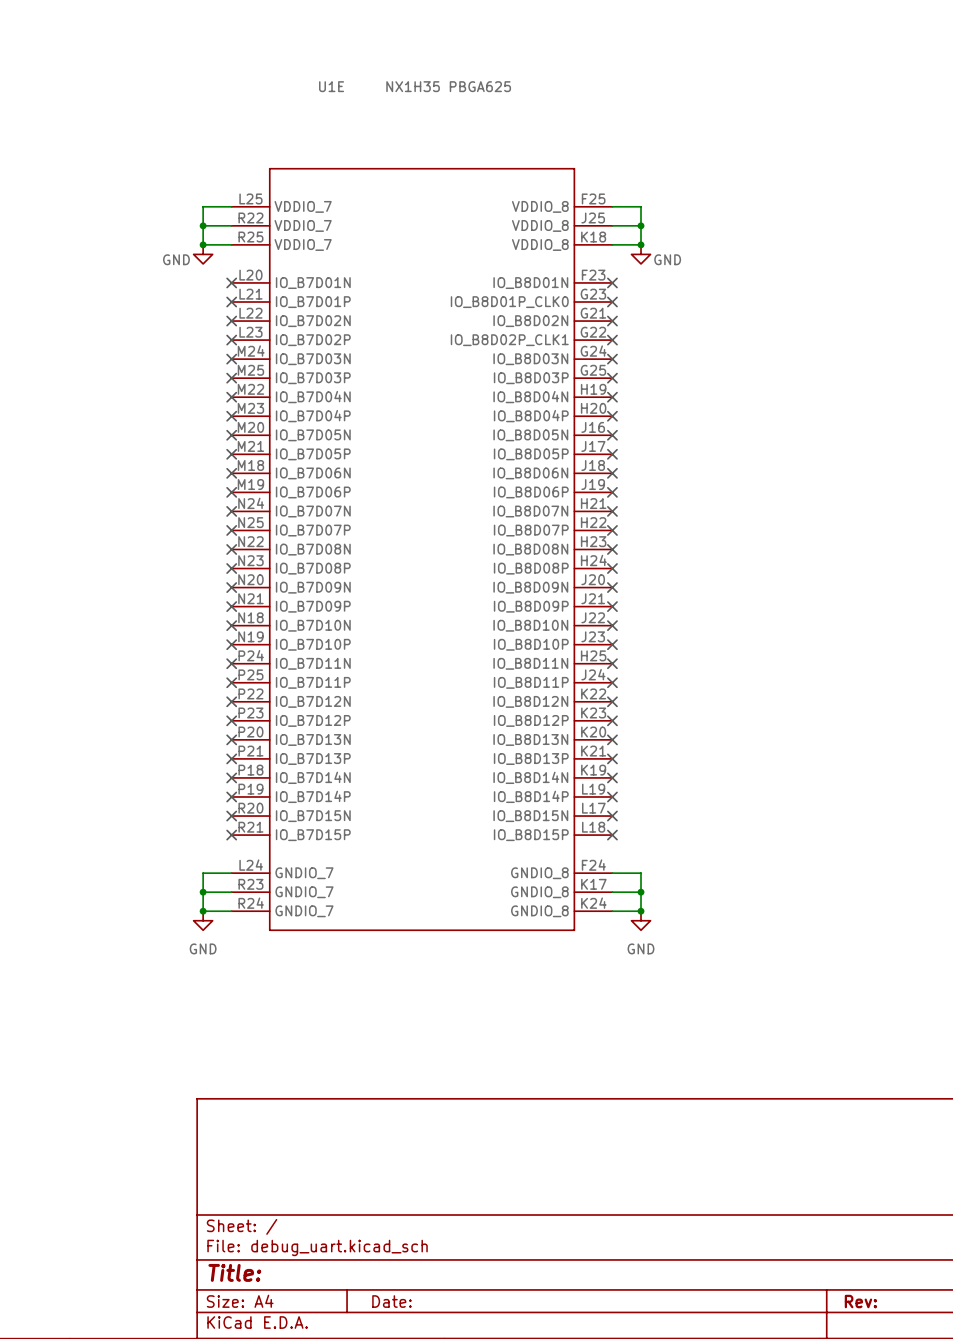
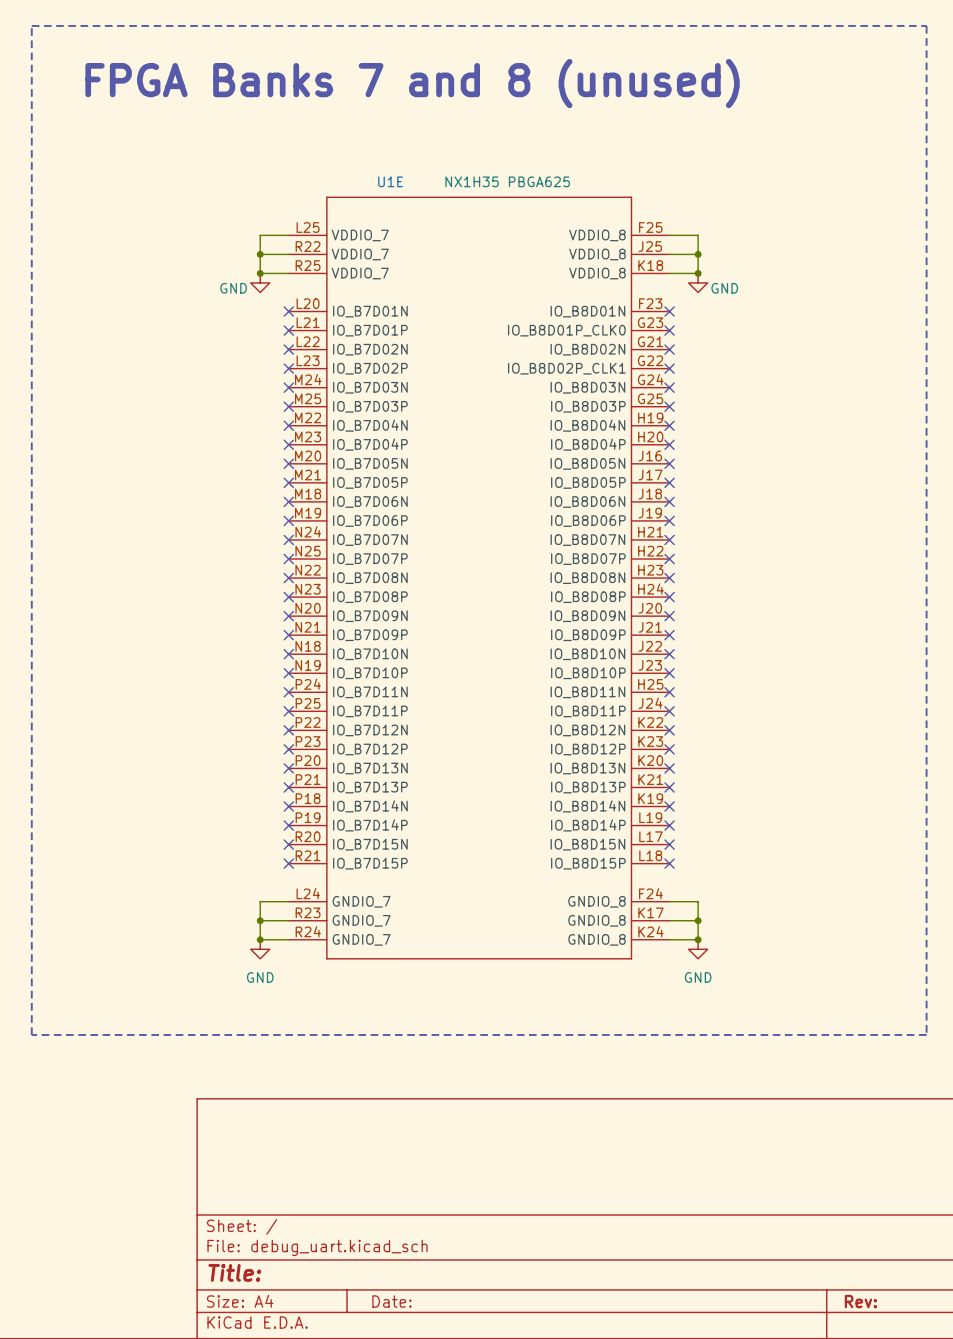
line: none -> (31, 25) (926, 25) (926, 1034) (31, 1034) (31, 25)
text: none -> FPGA Banks 7 and 8 (unused) (412, 83)
U1E name position: U1E (331, 86) -> U1E (390, 181)
U1E value position: NX1H35 PBGA625 (448, 86) -> NX1H35 PBGA625 (507, 181)
wire: (231, 206) (203, 206) (203, 244) (231, 244) -> (288, 235) (260, 235) (260, 273) (288, 273)
wire: (612, 206) (641, 206) (641, 244) (612, 244) -> (669, 235) (698, 235) (698, 273) (669, 273)
wire: (203, 225) (231, 225) -> (260, 254) (288, 254)
junction: (203, 225) -> none
wire: (612, 225) (641, 225) -> (669, 254) (698, 254)
junction: (641, 225) -> none
junction: (203, 244) -> none
junction: (641, 244) -> none
power symbol position: GND (203, 254) -> GND (260, 282)
junction: none -> (260, 254)
power symbol position: GND (641, 254) -> GND (698, 282)
junction: none -> (698, 254)
junction: none -> (260, 273)
junction: none -> (698, 273)
no-connect mark: (231, 282) -> none
no-connect mark: (612, 282) -> none
no-connect mark: (231, 302) -> none
no-connect mark: (612, 302) -> none
no-connect mark: none -> (288, 311)
no-connect mark: none -> (669, 311)
no-connect mark: (231, 321) -> none
no-connect mark: (612, 321) -> none
no-connect mark: none -> (288, 330)
no-connect mark: none -> (669, 330)
no-connect mark: (231, 340) -> none
no-connect mark: (612, 340) -> none
no-connect mark: none -> (288, 349)
no-connect mark: none -> (669, 349)
no-connect mark: (231, 359) -> none
no-connect mark: (612, 359) -> none
no-connect mark: none -> (288, 368)
no-connect mark: none -> (669, 368)
no-connect mark: (231, 378) -> none
no-connect mark: (612, 378) -> none
no-connect mark: none -> (288, 387)
no-connect mark: none -> (669, 387)
no-connect mark: (231, 397) -> none
no-connect mark: (612, 397) -> none
no-connect mark: none -> (288, 406)
no-connect mark: none -> (669, 406)
no-connect mark: (231, 416) -> none
no-connect mark: (612, 416) -> none
no-connect mark: none -> (288, 425)
no-connect mark: none -> (669, 425)
no-connect mark: (231, 435) -> none
no-connect mark: (612, 435) -> none
no-connect mark: none -> (288, 444)
no-connect mark: none -> (669, 444)
no-connect mark: (231, 454) -> none
no-connect mark: (612, 454) -> none
no-connect mark: none -> (288, 463)
no-connect mark: none -> (669, 463)
no-connect mark: (231, 473) -> none
no-connect mark: (612, 473) -> none
no-connect mark: none -> (288, 482)
no-connect mark: none -> (669, 482)
no-connect mark: (231, 492) -> none
no-connect mark: (612, 492) -> none
no-connect mark: none -> (288, 501)
no-connect mark: none -> (669, 501)
no-connect mark: (231, 511) -> none
no-connect mark: (612, 511) -> none
no-connect mark: none -> (288, 520)
no-connect mark: none -> (669, 520)
no-connect mark: (231, 530) -> none
no-connect mark: (612, 530) -> none
no-connect mark: none -> (288, 539)
no-connect mark: none -> (669, 539)
no-connect mark: (231, 549) -> none
U1E position: (422, 549) -> (479, 578)
no-connect mark: (612, 549) -> none
no-connect mark: none -> (288, 559)
no-connect mark: none -> (669, 559)
no-connect mark: (231, 568) -> none
no-connect mark: (612, 568) -> none
no-connect mark: none -> (288, 578)
no-connect mark: none -> (669, 578)
no-connect mark: (231, 587) -> none
no-connect mark: (612, 587) -> none
no-connect mark: none -> (288, 597)
no-connect mark: none -> (669, 597)
no-connect mark: (231, 606) -> none
no-connect mark: (612, 606) -> none
no-connect mark: none -> (288, 616)
no-connect mark: none -> (669, 616)
no-connect mark: (231, 625) -> none
no-connect mark: (612, 625) -> none
no-connect mark: none -> (288, 635)
no-connect mark: none -> (669, 635)
no-connect mark: (231, 644) -> none
no-connect mark: (612, 644) -> none
no-connect mark: none -> (288, 654)
no-connect mark: none -> (669, 654)
no-connect mark: (231, 663) -> none
no-connect mark: (612, 663) -> none
no-connect mark: none -> (288, 673)
no-connect mark: none -> (669, 673)
no-connect mark: (231, 682) -> none
no-connect mark: (612, 682) -> none
no-connect mark: none -> (288, 692)
no-connect mark: none -> (669, 692)
no-connect mark: (231, 701) -> none
no-connect mark: (612, 701) -> none
no-connect mark: none -> (288, 711)
no-connect mark: none -> (669, 711)
no-connect mark: (231, 720) -> none
no-connect mark: (612, 720) -> none
no-connect mark: none -> (288, 730)
no-connect mark: none -> (669, 730)
no-connect mark: (231, 739) -> none
no-connect mark: (612, 739) -> none
no-connect mark: none -> (288, 749)
no-connect mark: none -> (669, 749)
no-connect mark: (231, 758) -> none
no-connect mark: (612, 758) -> none
no-connect mark: none -> (288, 768)
no-connect mark: none -> (669, 768)
no-connect mark: (231, 777) -> none
no-connect mark: (612, 777) -> none
no-connect mark: none -> (288, 787)
no-connect mark: none -> (669, 787)
no-connect mark: (231, 796) -> none
no-connect mark: (612, 796) -> none
no-connect mark: none -> (288, 806)
no-connect mark: none -> (669, 806)
no-connect mark: (231, 816) -> none
no-connect mark: (612, 816) -> none
no-connect mark: none -> (288, 825)
no-connect mark: none -> (669, 825)
no-connect mark: (231, 835) -> none
no-connect mark: (612, 835) -> none
no-connect mark: none -> (288, 844)
no-connect mark: none -> (669, 844)
no-connect mark: none -> (288, 863)
no-connect mark: none -> (669, 863)
wire: (231, 873) (203, 873) (203, 911) (231, 911) -> (288, 901) (260, 901) (260, 939) (288, 939)
wire: (612, 873) (641, 873) (641, 911) (612, 911) -> (669, 901) (698, 901) (698, 939) (669, 939)
wire: (203, 892) (231, 892) -> (260, 920) (288, 920)
junction: (203, 892) -> none
wire: (612, 892) (641, 892) -> (669, 920) (698, 920)
junction: (641, 892) -> none
junction: (203, 911) -> none
junction: (641, 911) -> none
power symbol position: GND (203, 920) -> GND (260, 949)
junction: none -> (260, 920)
power symbol position: GND (641, 920) -> GND (698, 949)
junction: none -> (698, 920)
junction: none -> (260, 939)
junction: none -> (698, 939)

